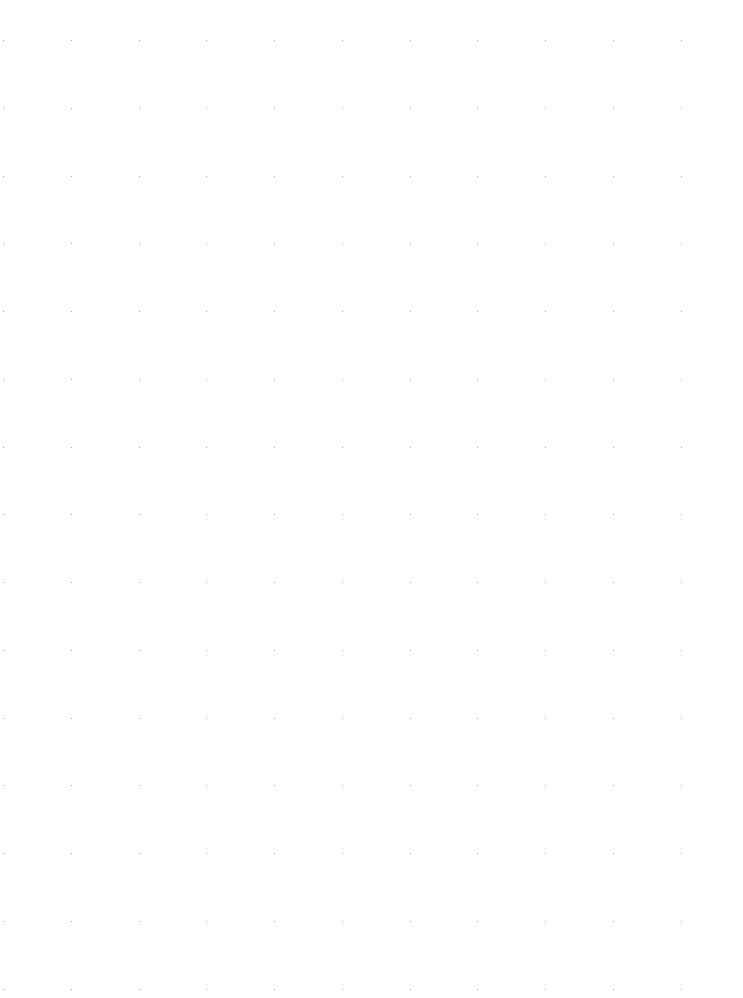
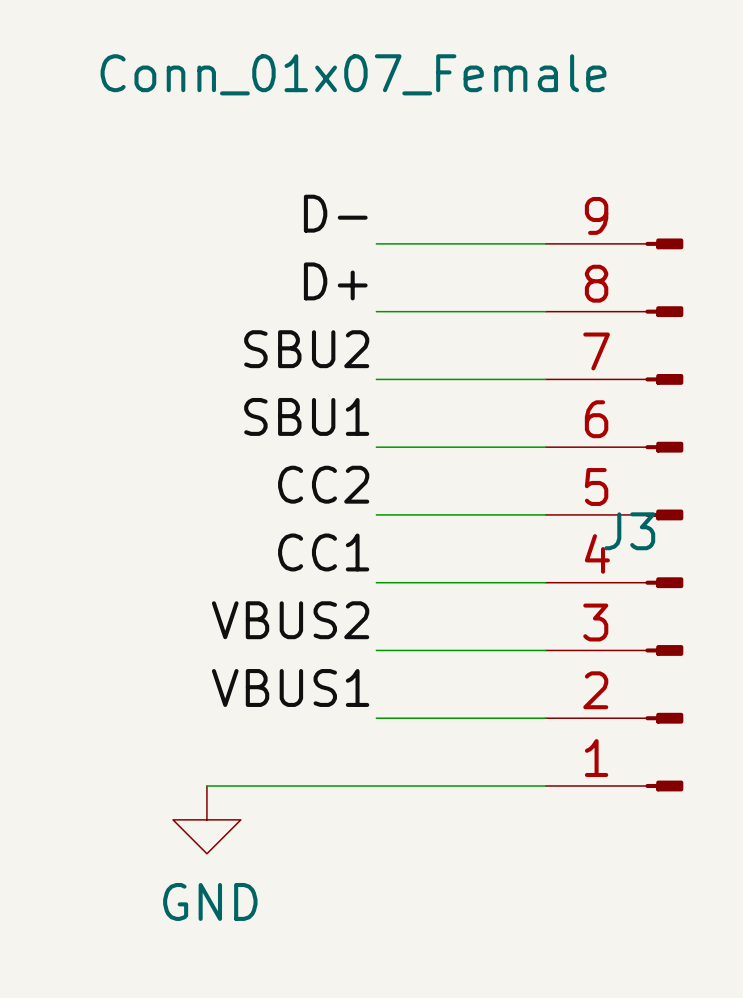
label: none -> D- (335, 213)
wire: none -> (376, 243) (545, 243)
label: none -> D+ (335, 281)
wire: none -> (376, 311) (545, 311)
label: none -> SBU2 (306, 349)
wire: none -> (376, 379) (545, 379)
label: none -> SBU1 (306, 416)
wire: none -> (376, 447) (545, 447)
label: none -> CC2 (323, 484)
wire: none -> (376, 514) (545, 514)
J3: none -> Conn_01x07_Female (614, 514)
label: none -> CC1 (323, 552)
wire: none -> (376, 582) (545, 582)
label: none -> VBUS2 (290, 620)
wire: none -> (376, 650) (545, 650)
label: none -> VBUS1 (290, 687)
wire: none -> (376, 718) (545, 718)
wire: none -> (206, 785) (545, 785)
power symbol: none -> GND (206, 819)

